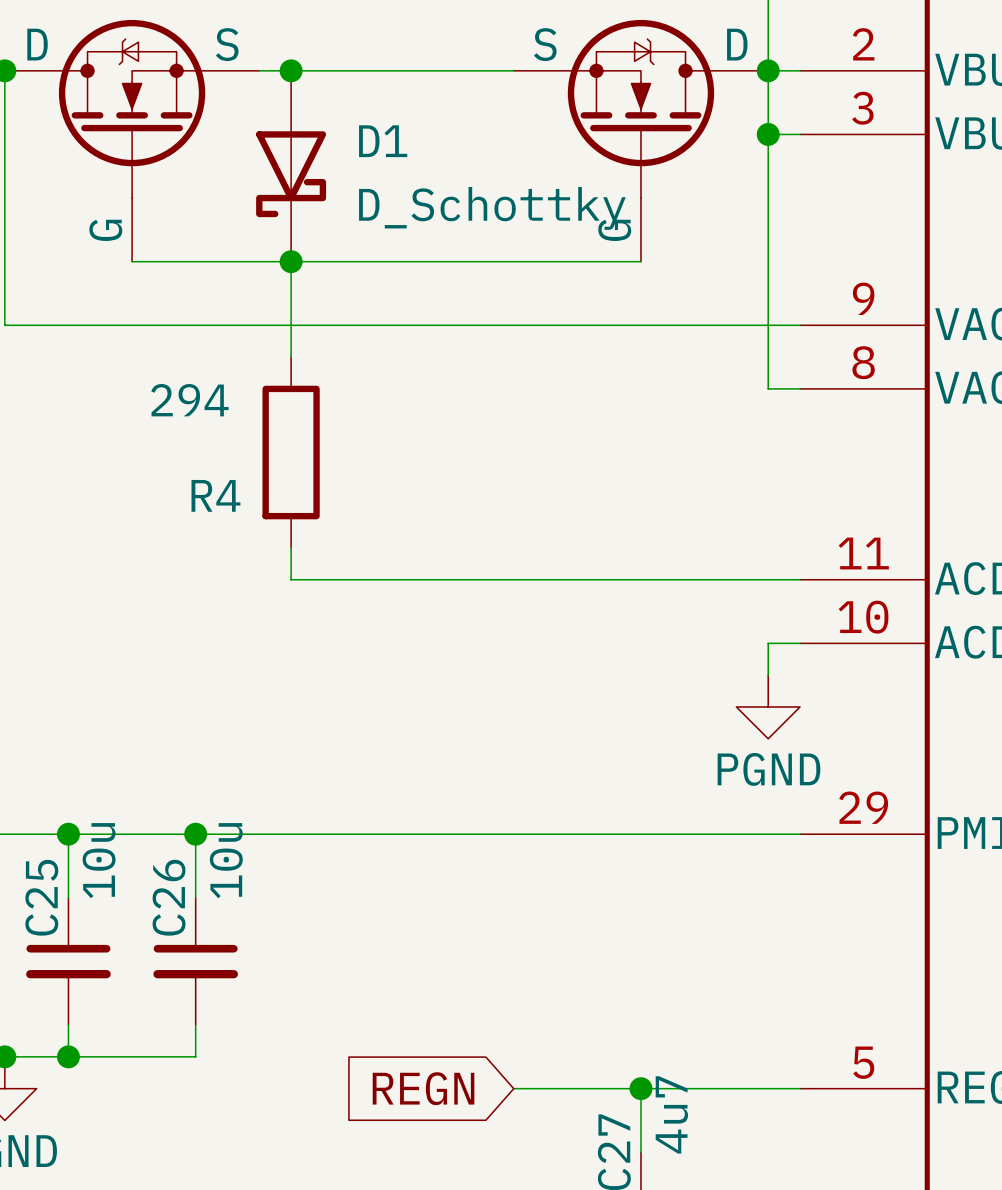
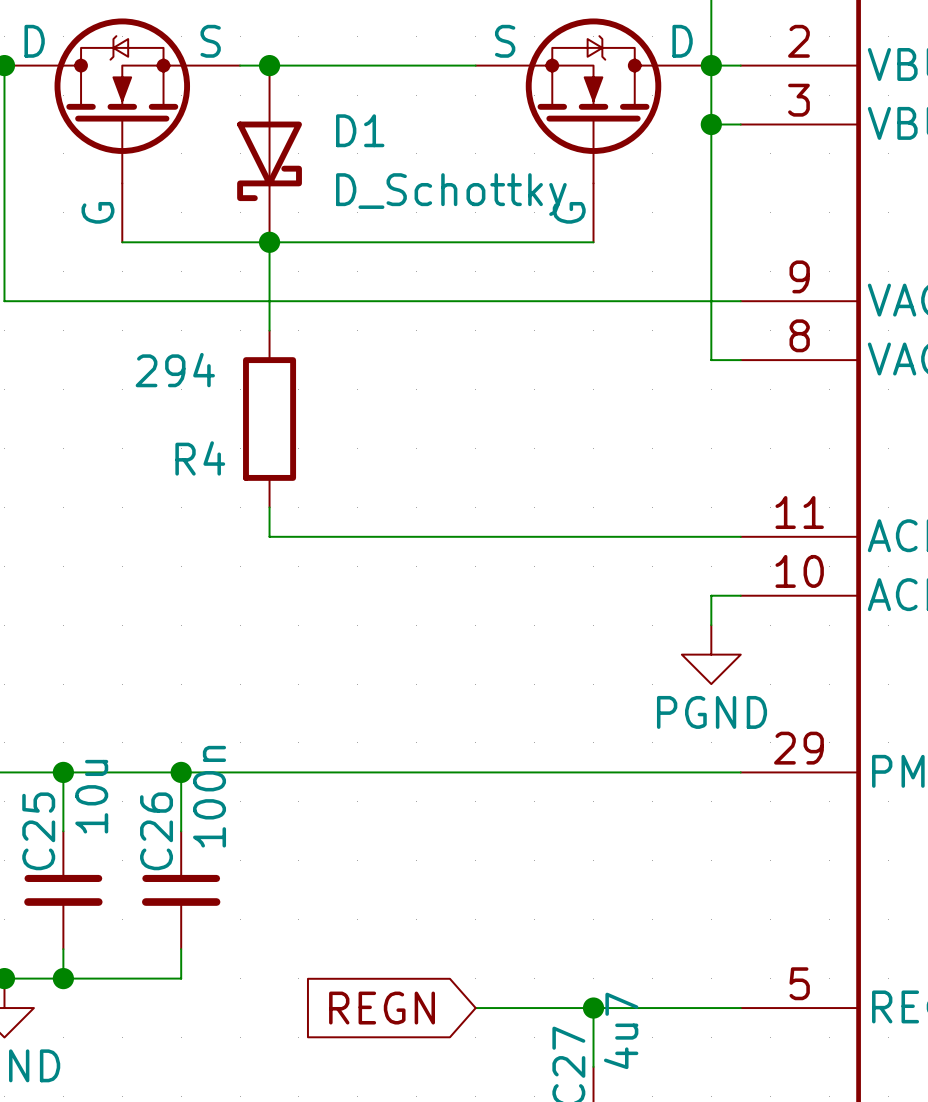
C26 value: 10u (226, 860) -> 100n (209, 796)

